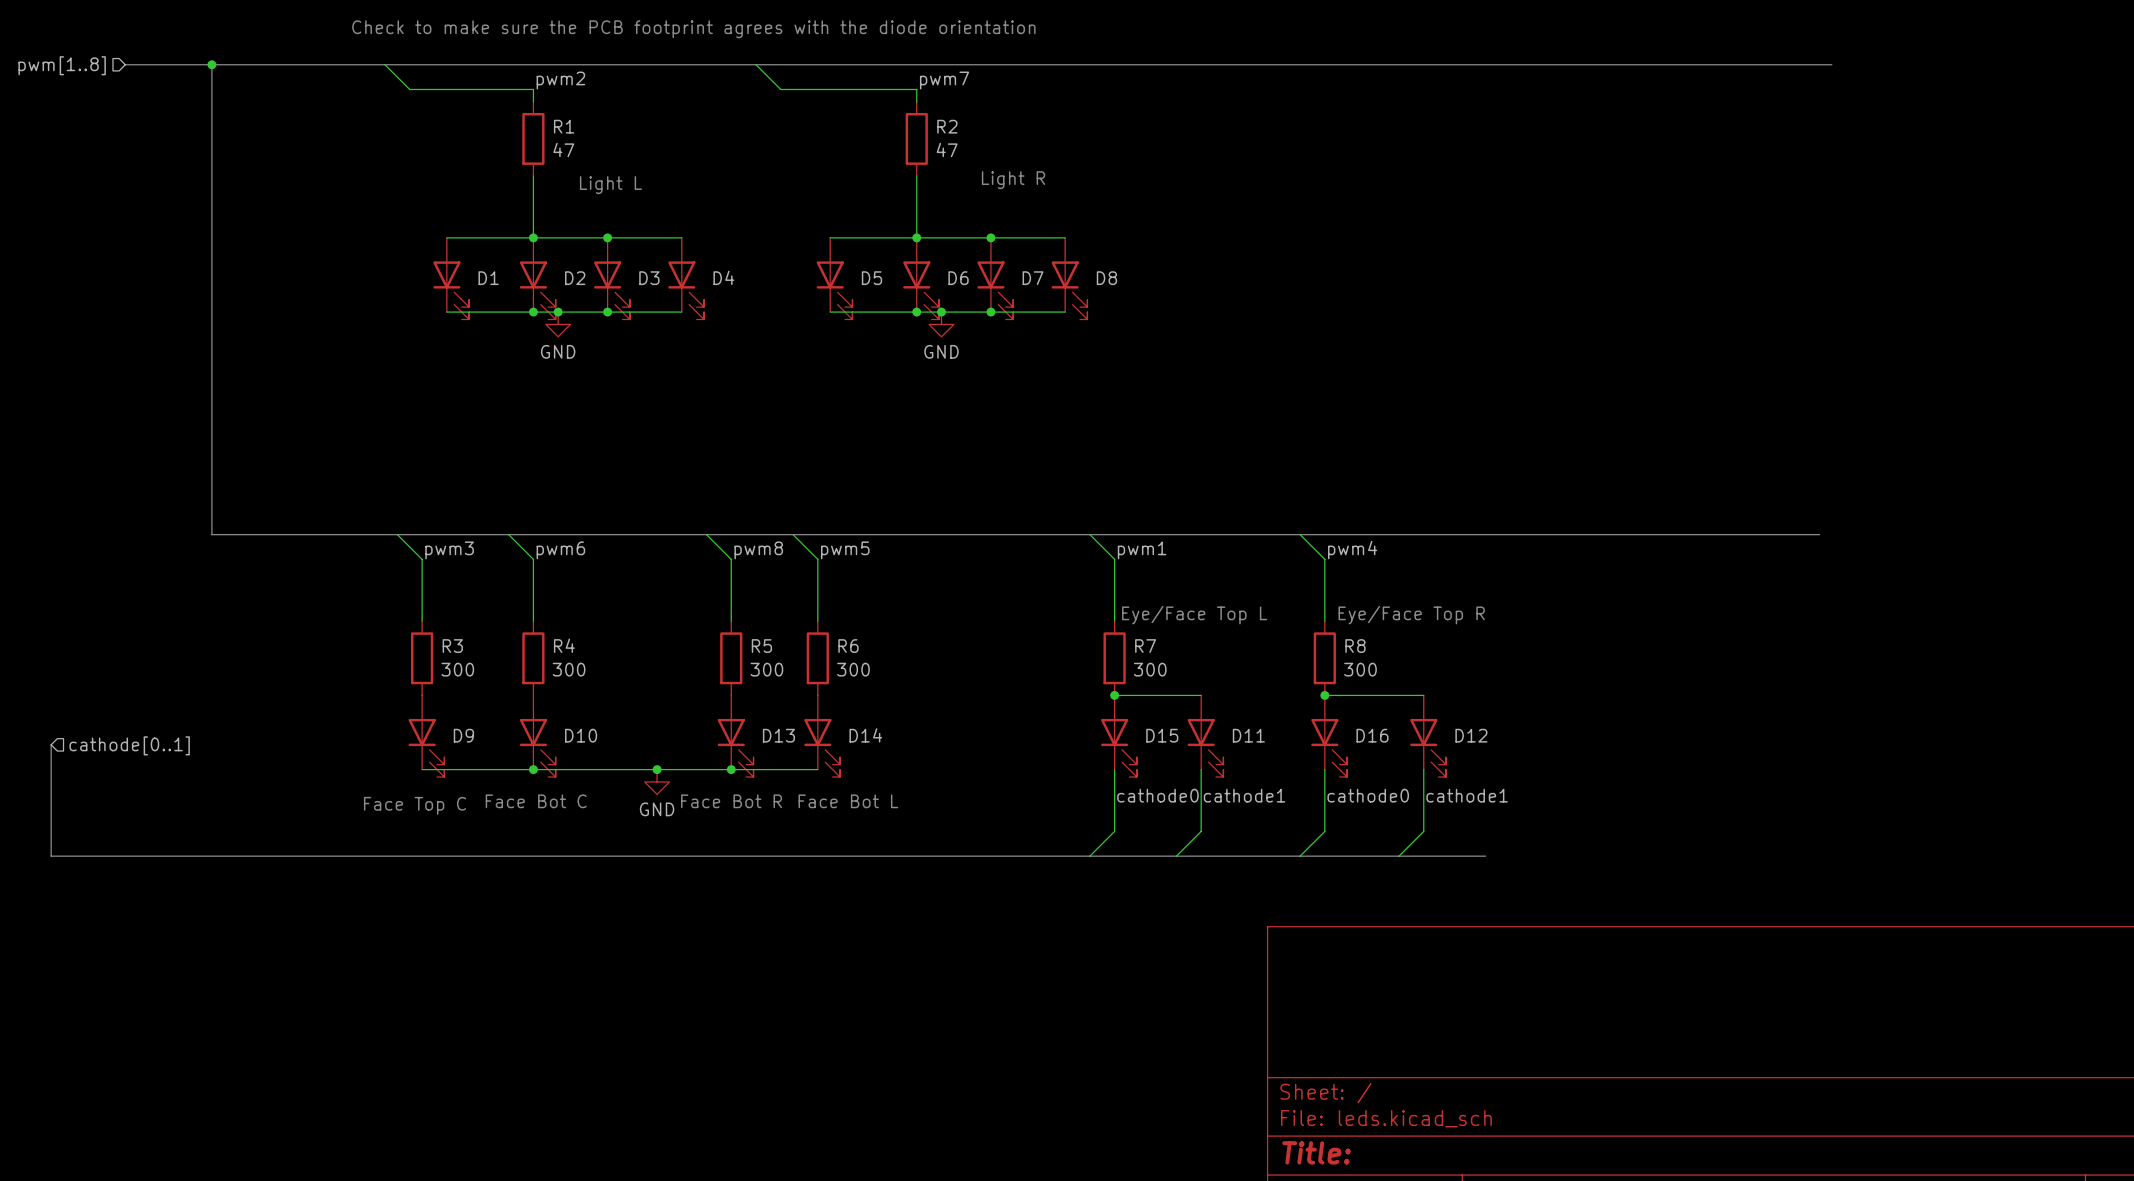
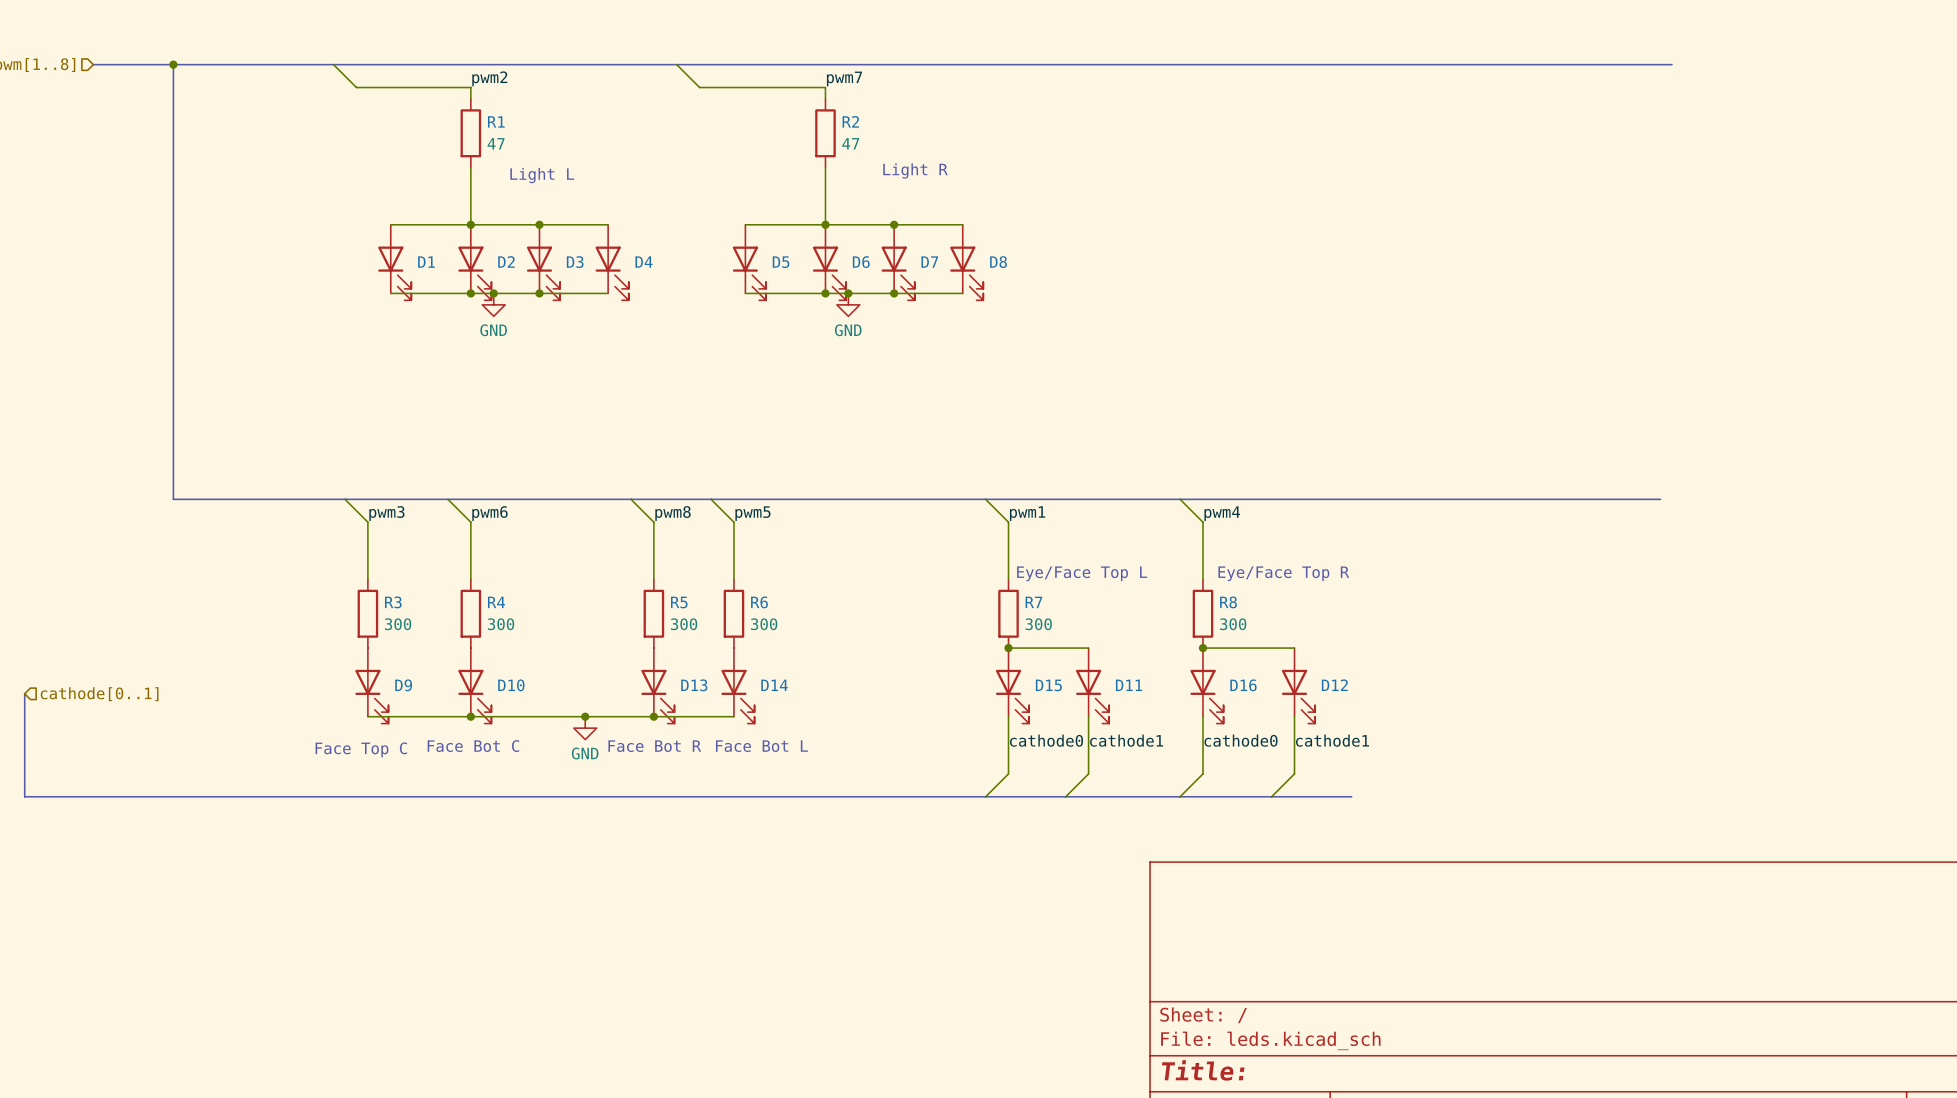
text: Check to make sure the PCB footprint agrees with the diode orientation (693, 29) -> none

